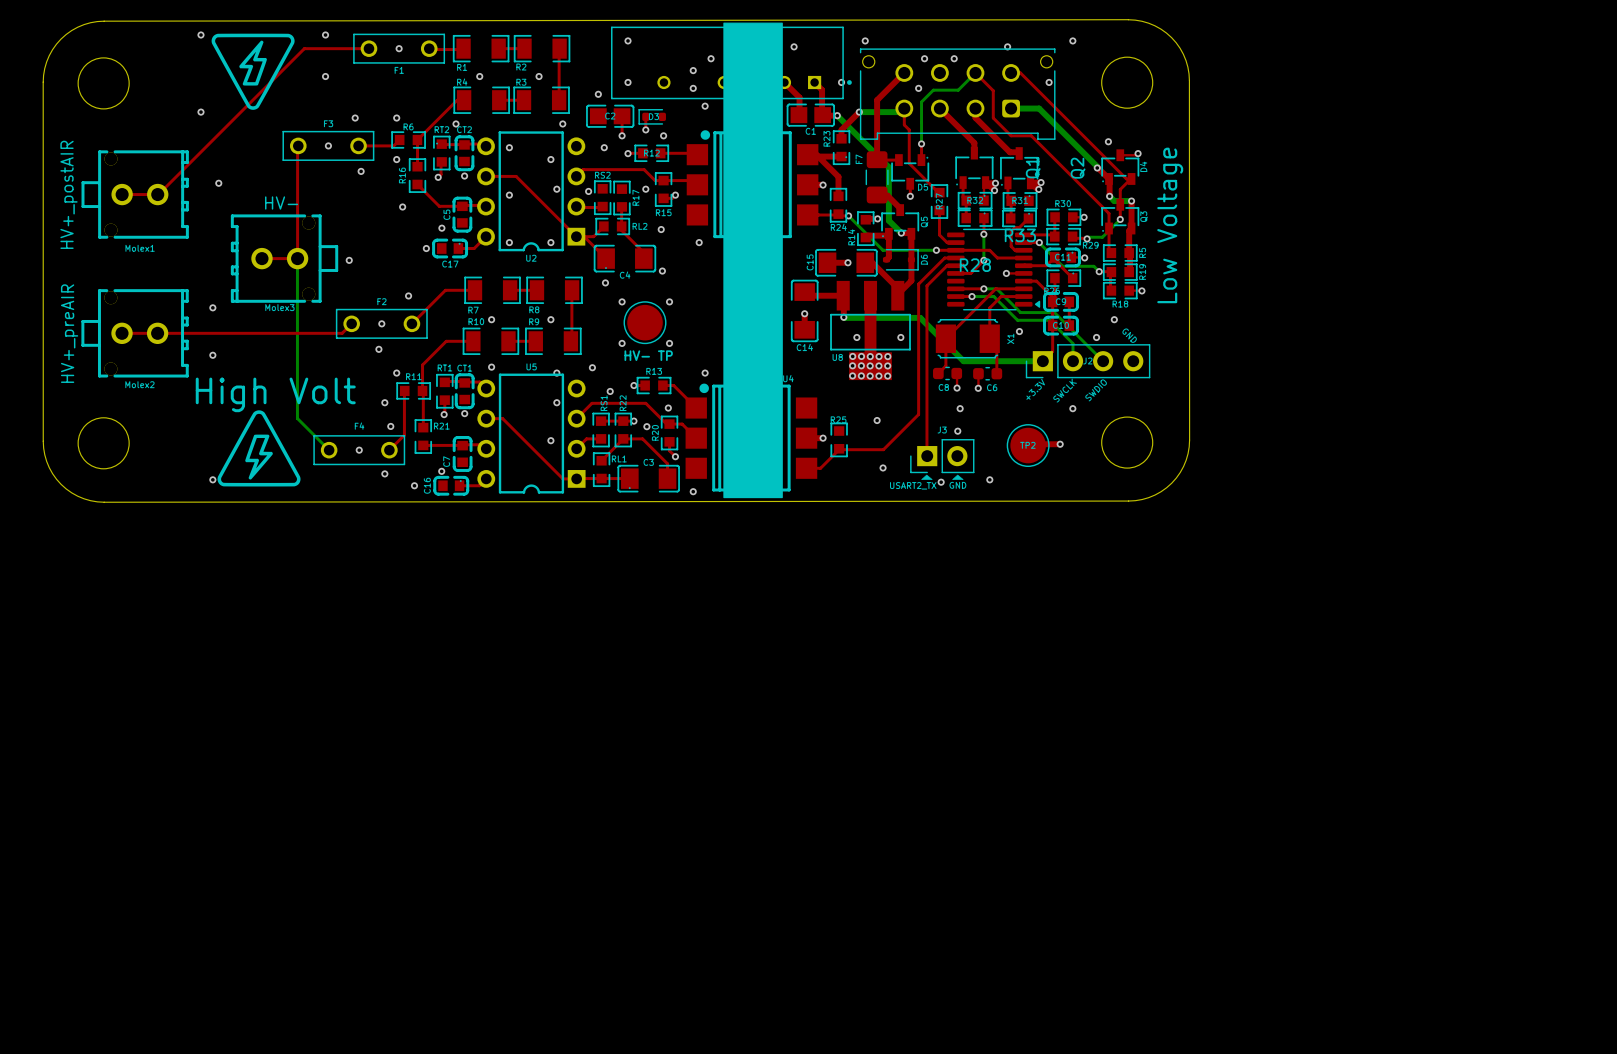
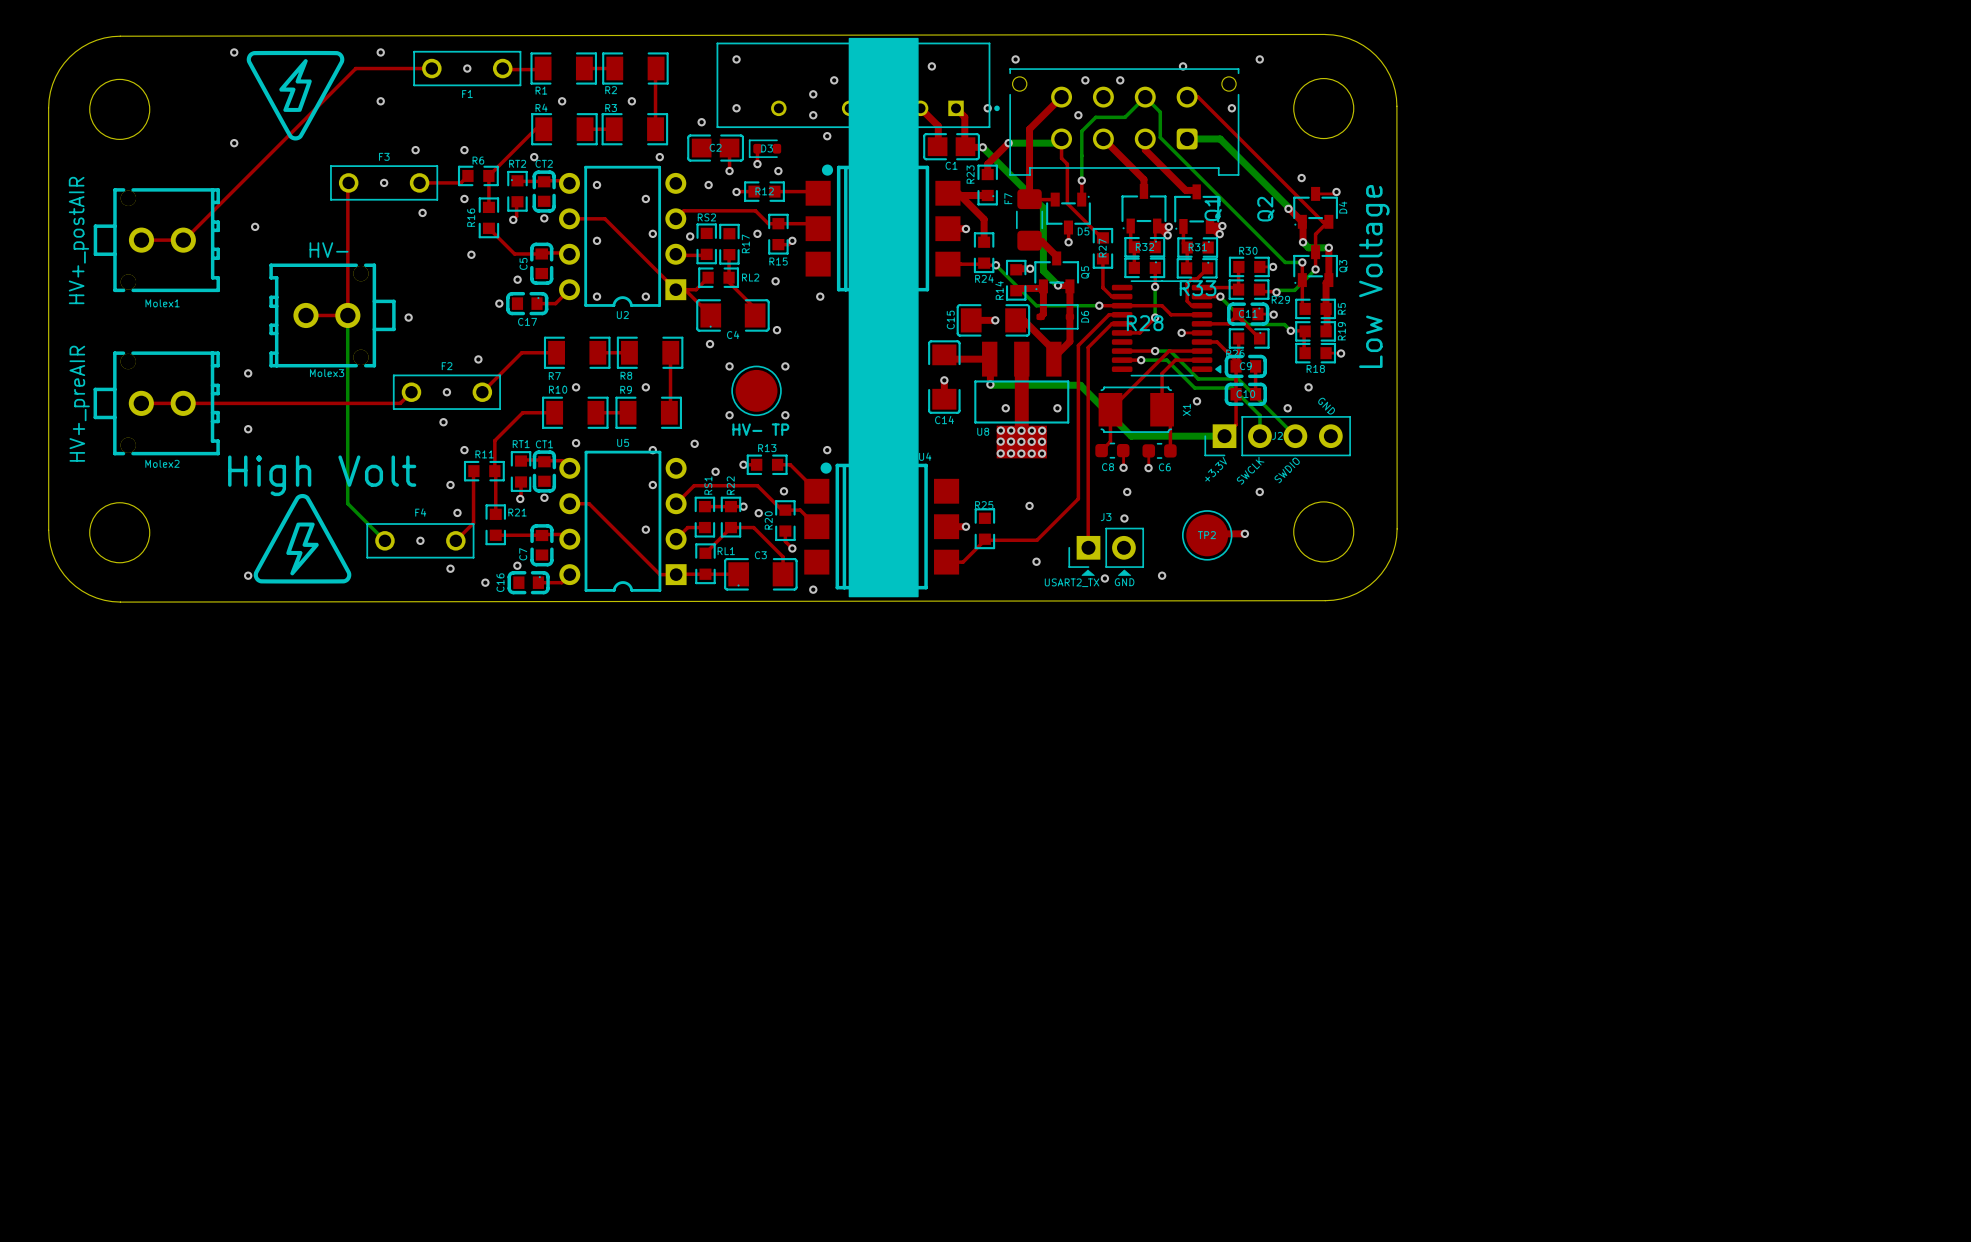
top track: (975, 72) (993, 90) (993, 118) (1011, 135) (1031, 135) (1109, 213) -> none
bottom track: none -> (1145, 97) (1160, 112) (1160, 137) (1285, 262) (1302, 262)
via: none -> (1302, 262)

